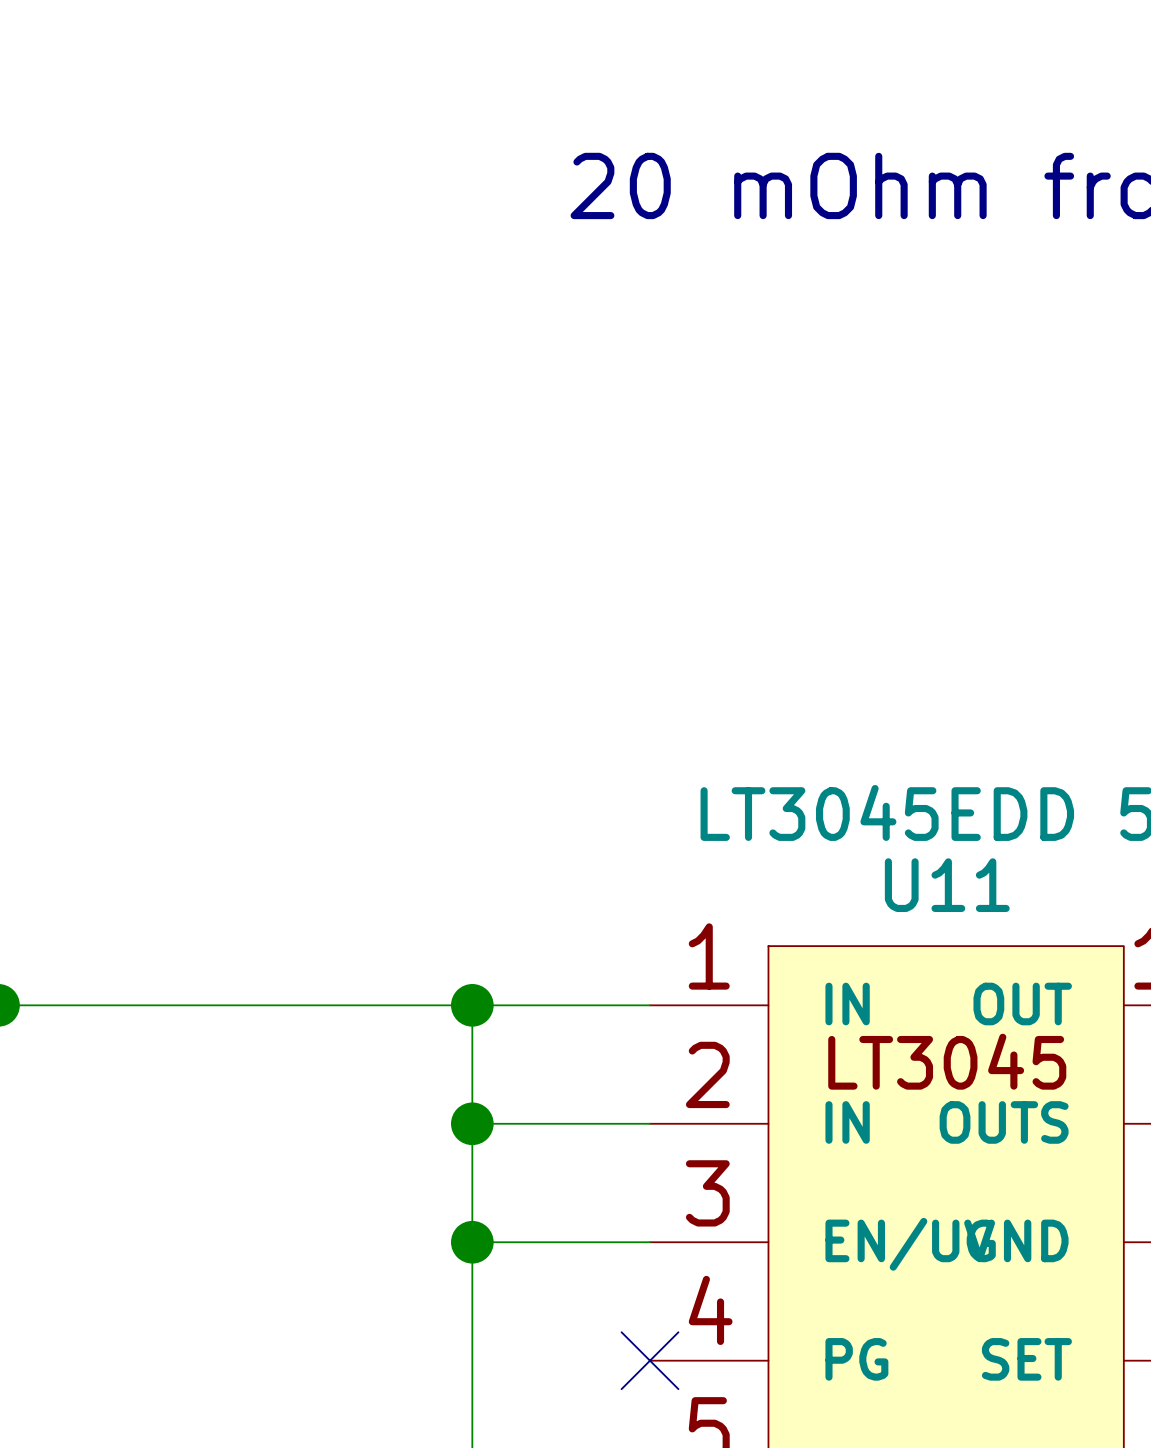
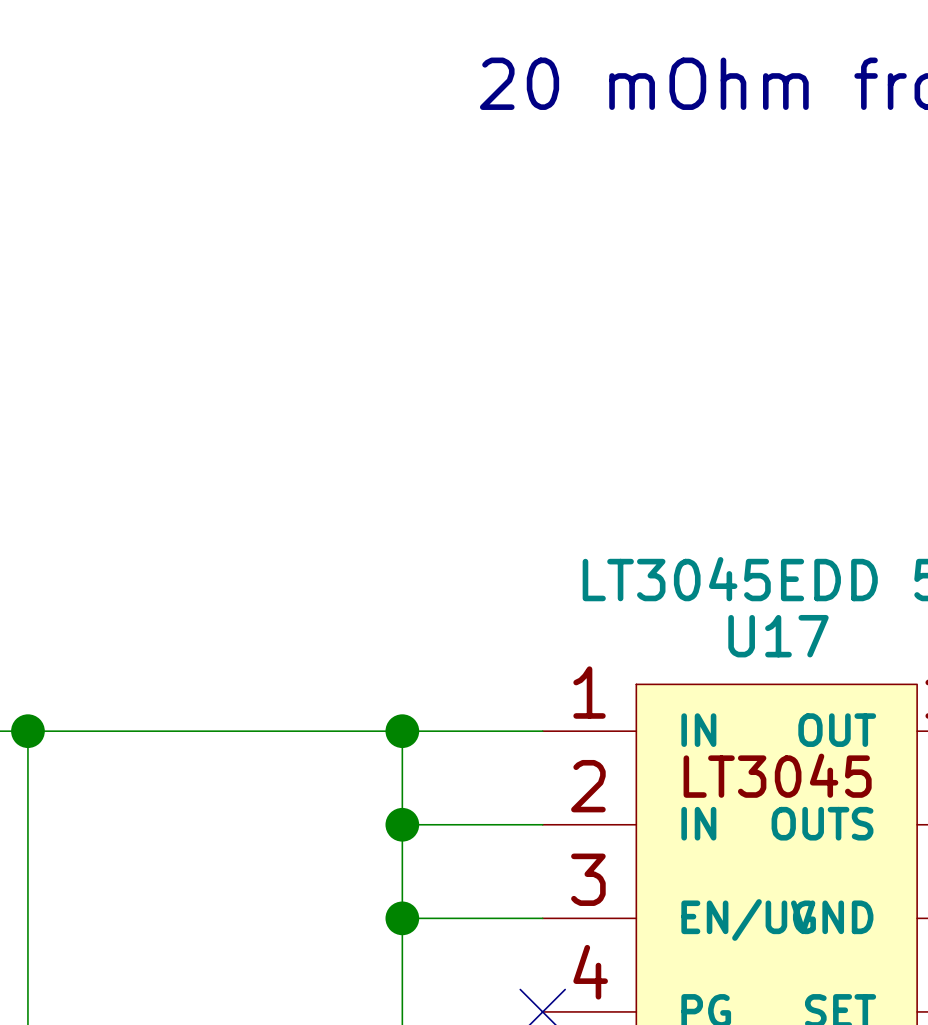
U11 name: U11 (947, 885) -> U17 (778, 636)

